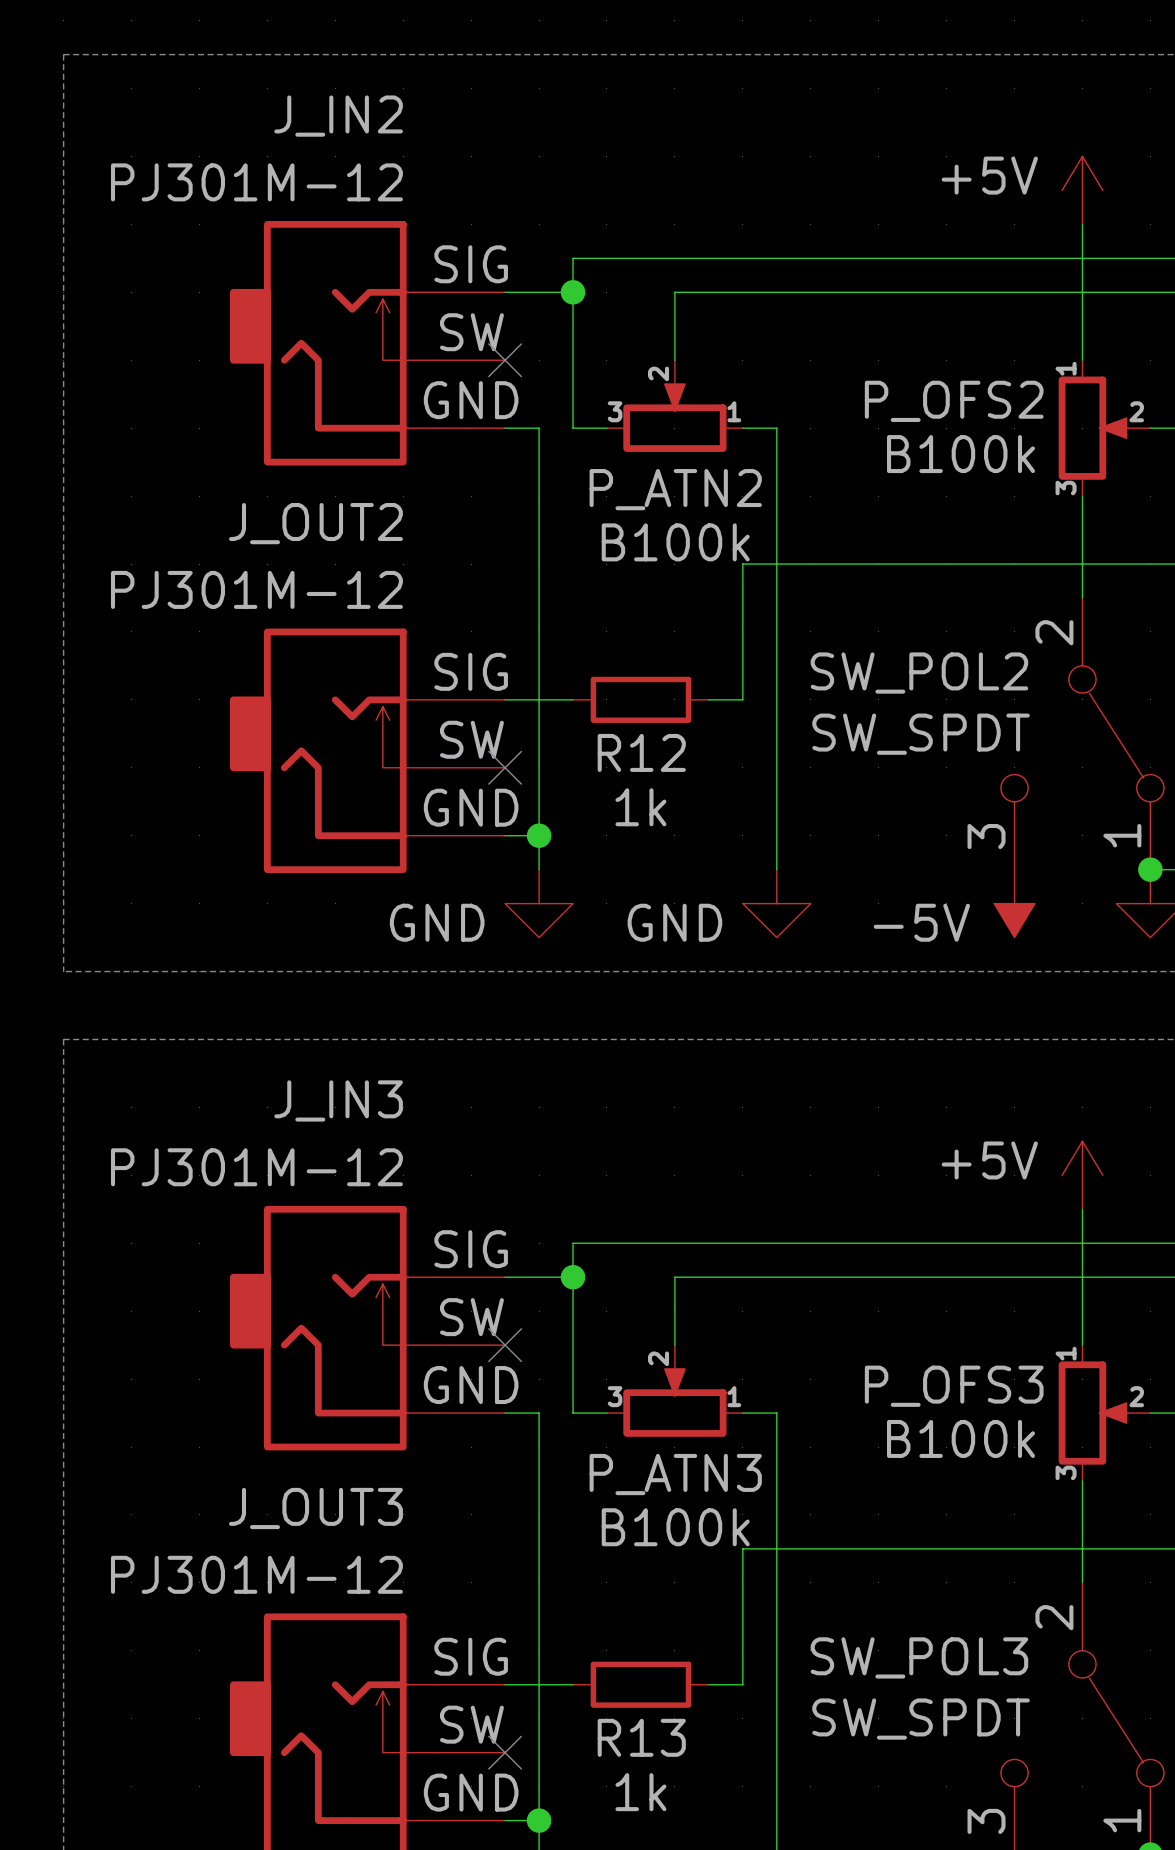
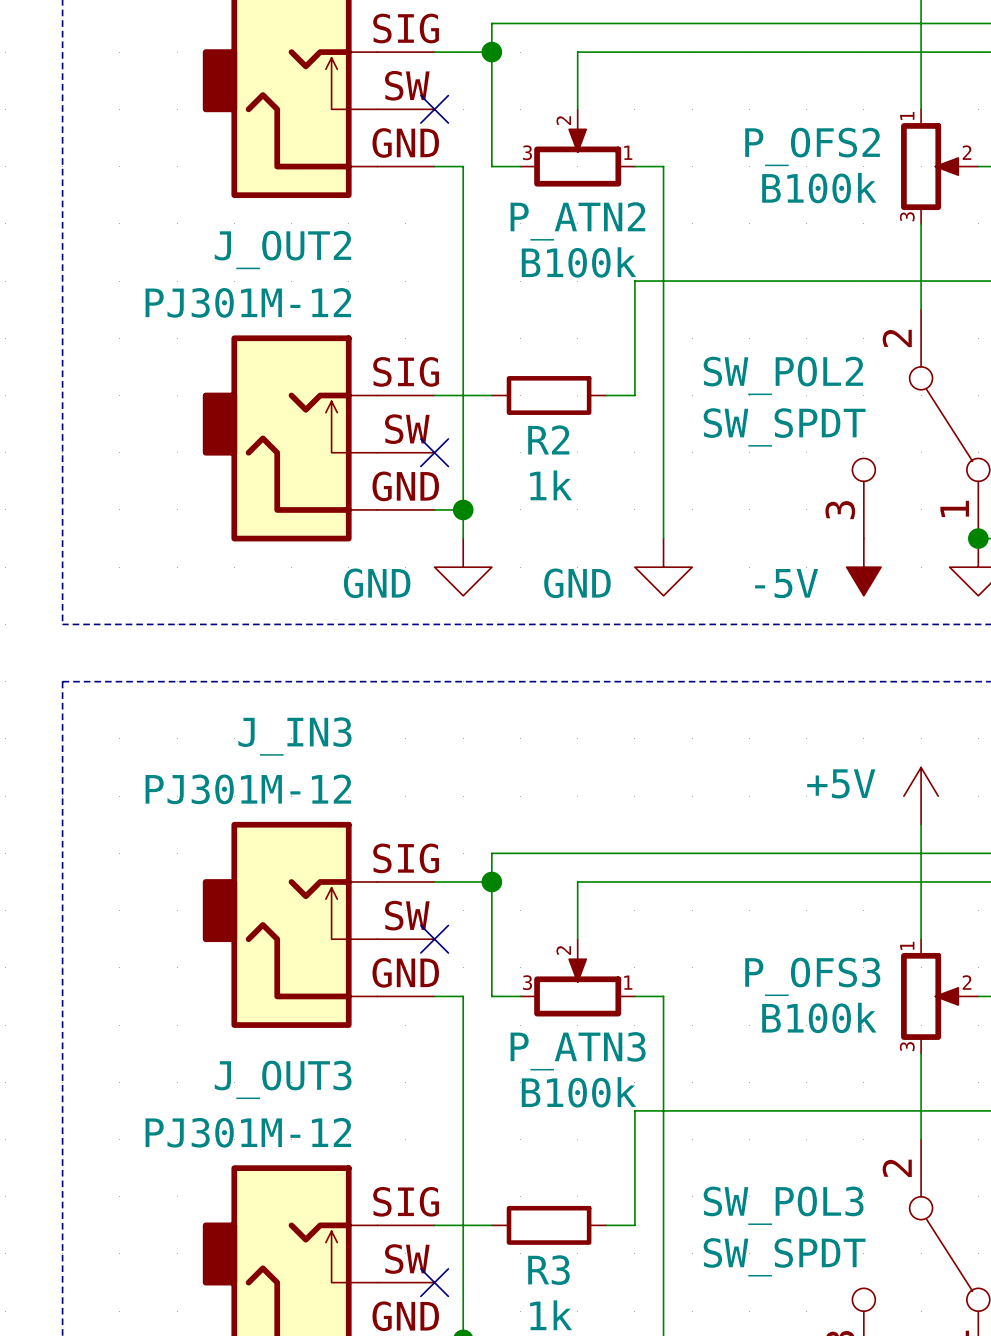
R12 name: R12 (641, 752) -> R2 (548, 439)
R13 name: R13 (641, 1737) -> R3 (548, 1270)

